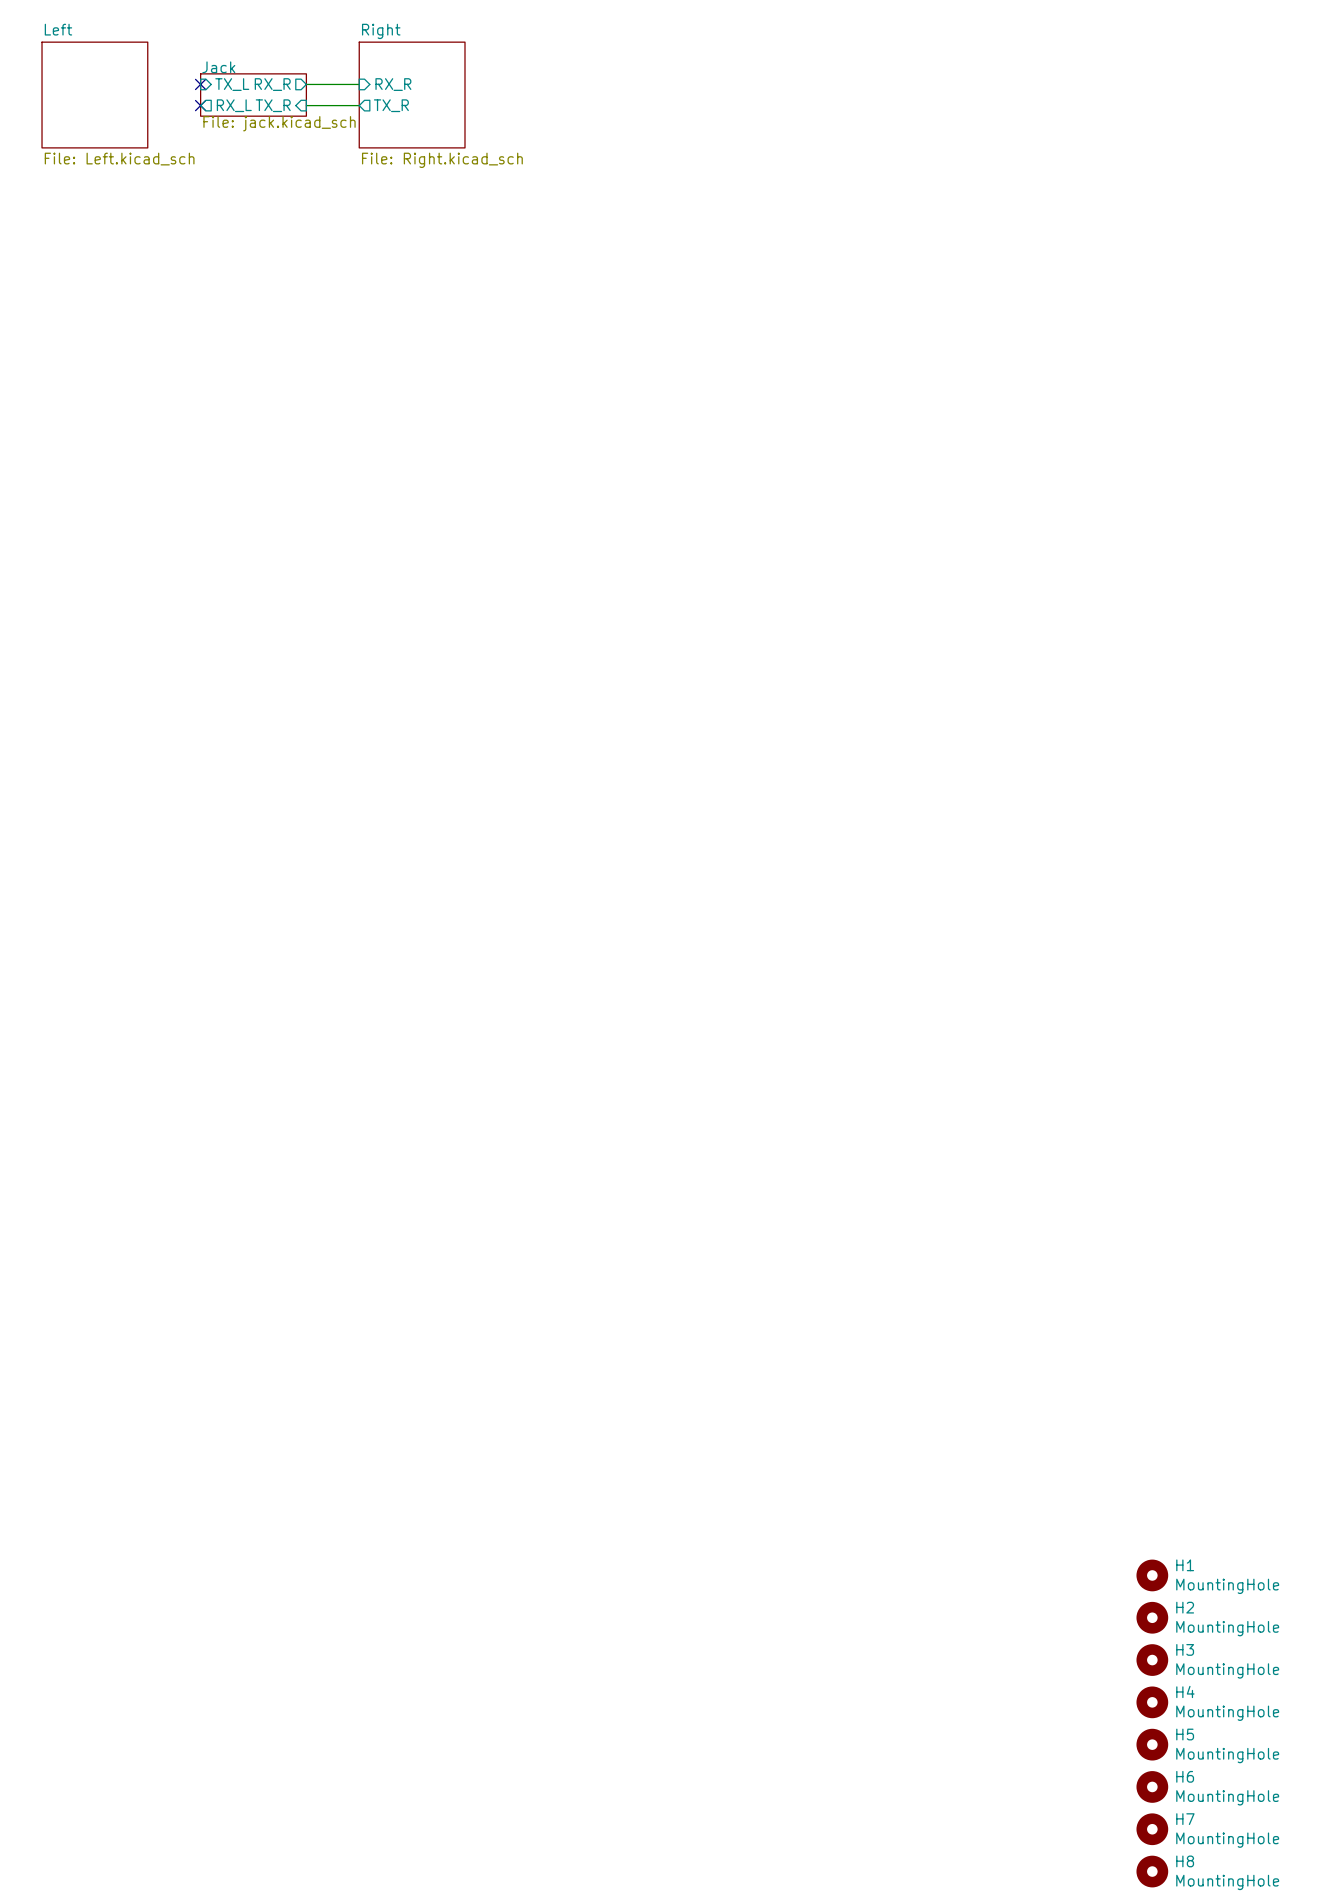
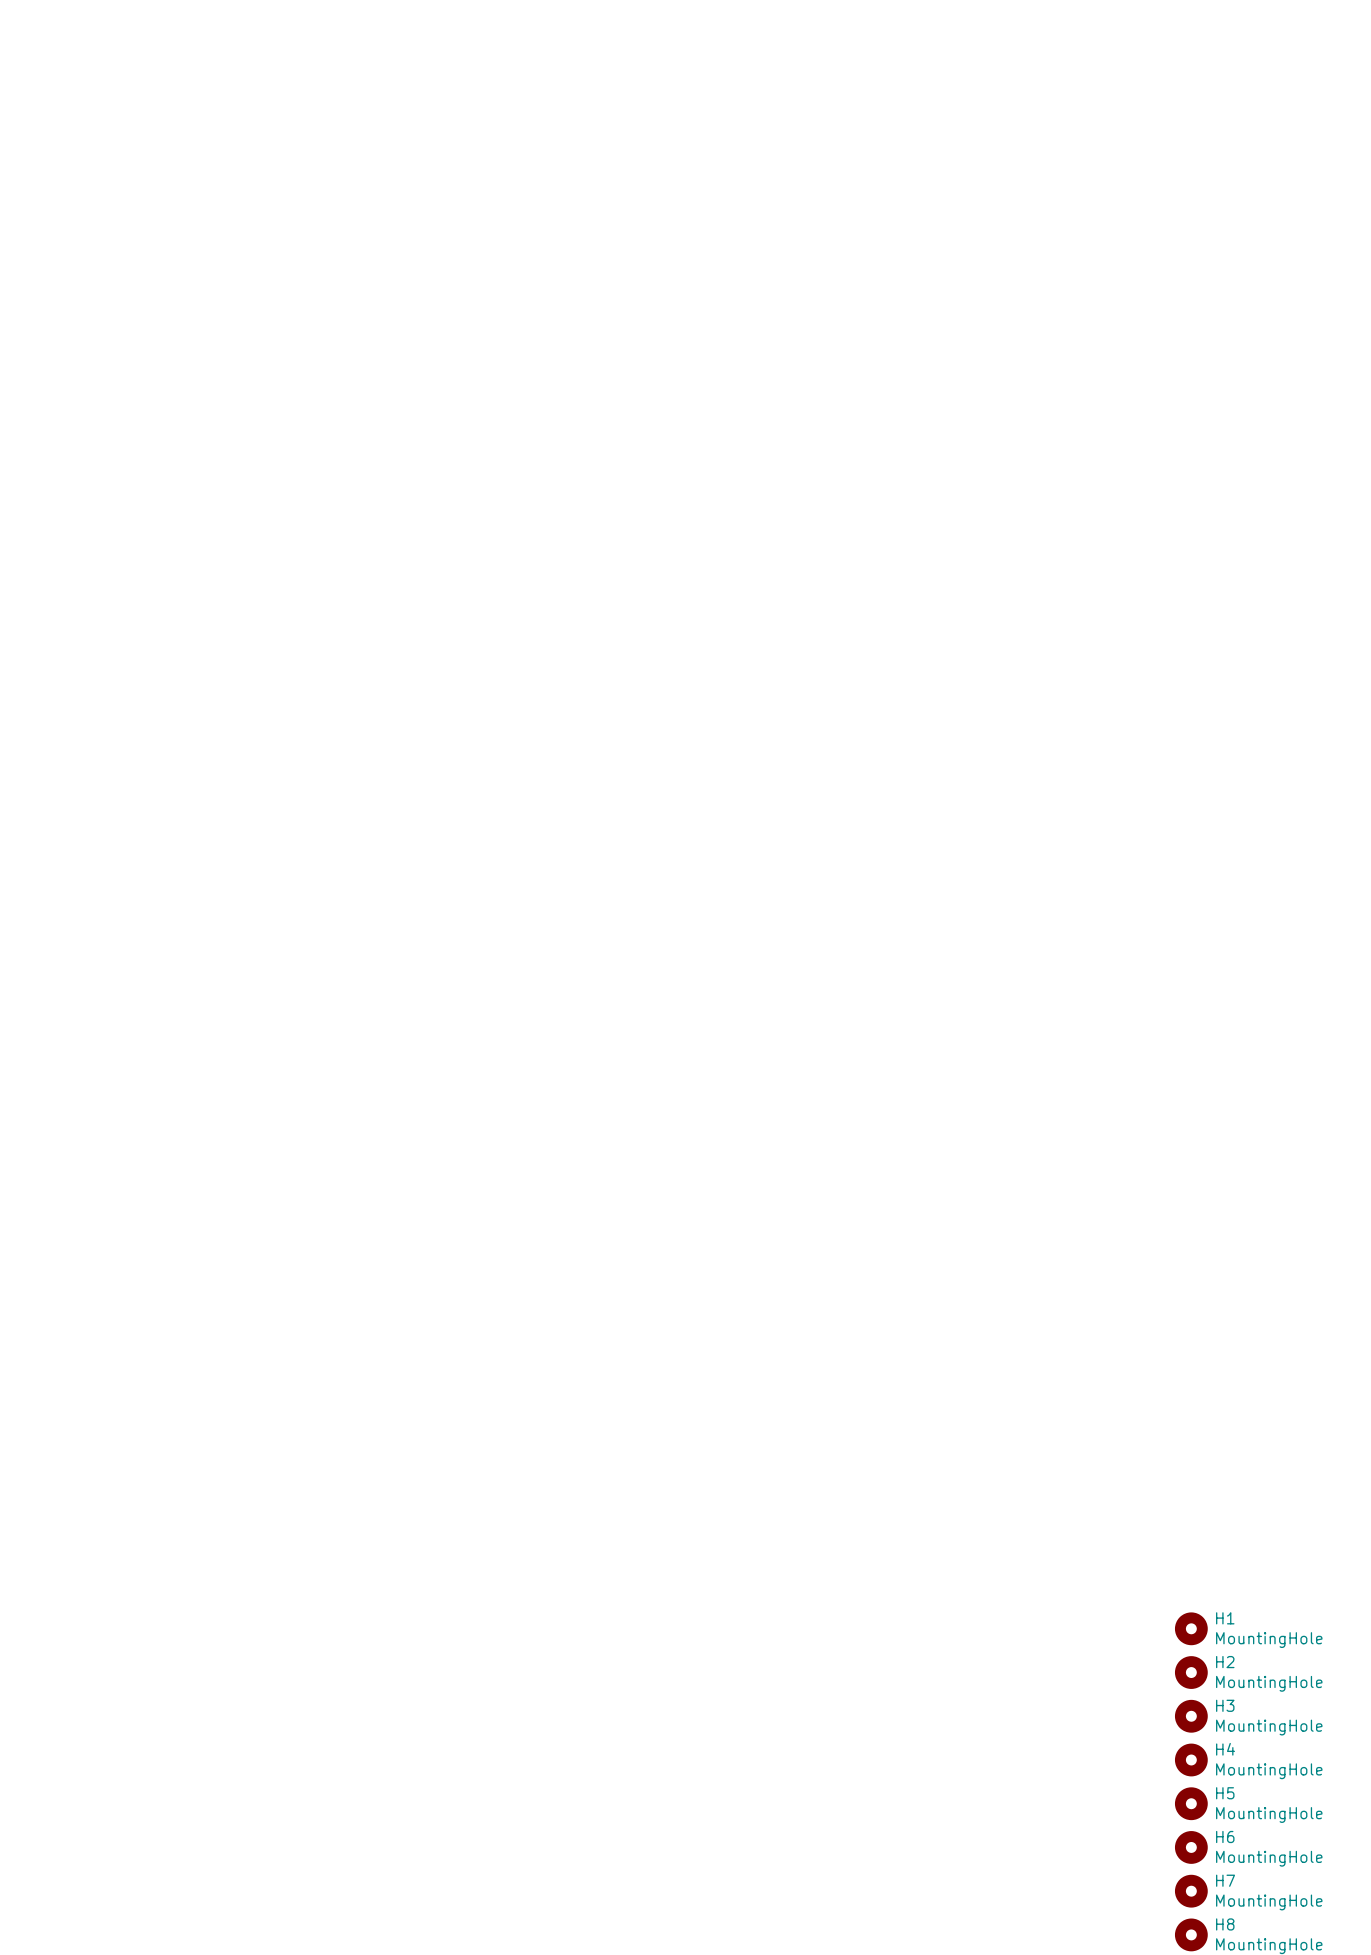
no-connect mark: (200, 84) -> none
sheet pin: TX_L (232, 84) -> none
sheet pin: RX_R (272, 84) -> none
wire: (306, 84) (359, 84) -> none
sheet pin: RX_R (393, 84) -> none
sheet Left: File: Left.kicad_sch (94, 95) -> none
sheet Jack: File: jack.kicad_sch (253, 95) -> none
sheet Right: File: Right.kicad_sch (412, 95) -> none
no-connect mark: (200, 105) -> none
sheet pin: RX_L (234, 105) -> none
sheet pin: TX_R (273, 105) -> none
wire: (306, 105) (359, 105) -> none
sheet pin: TX_R (391, 105) -> none

